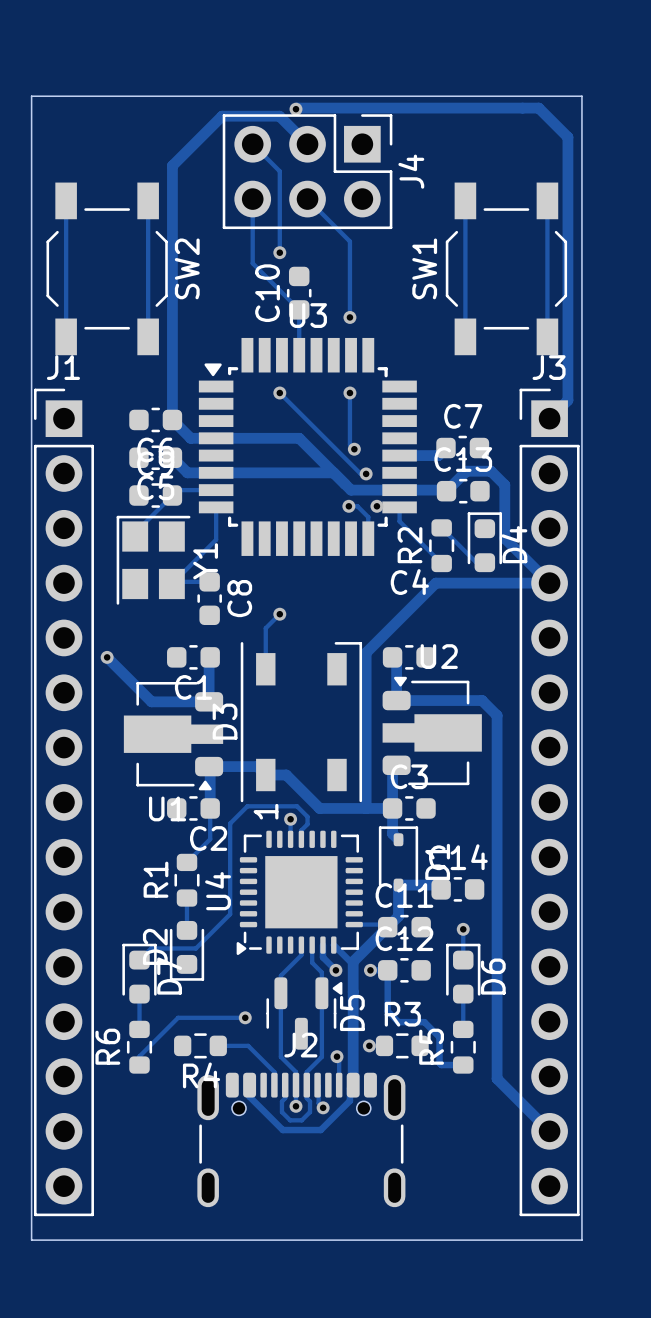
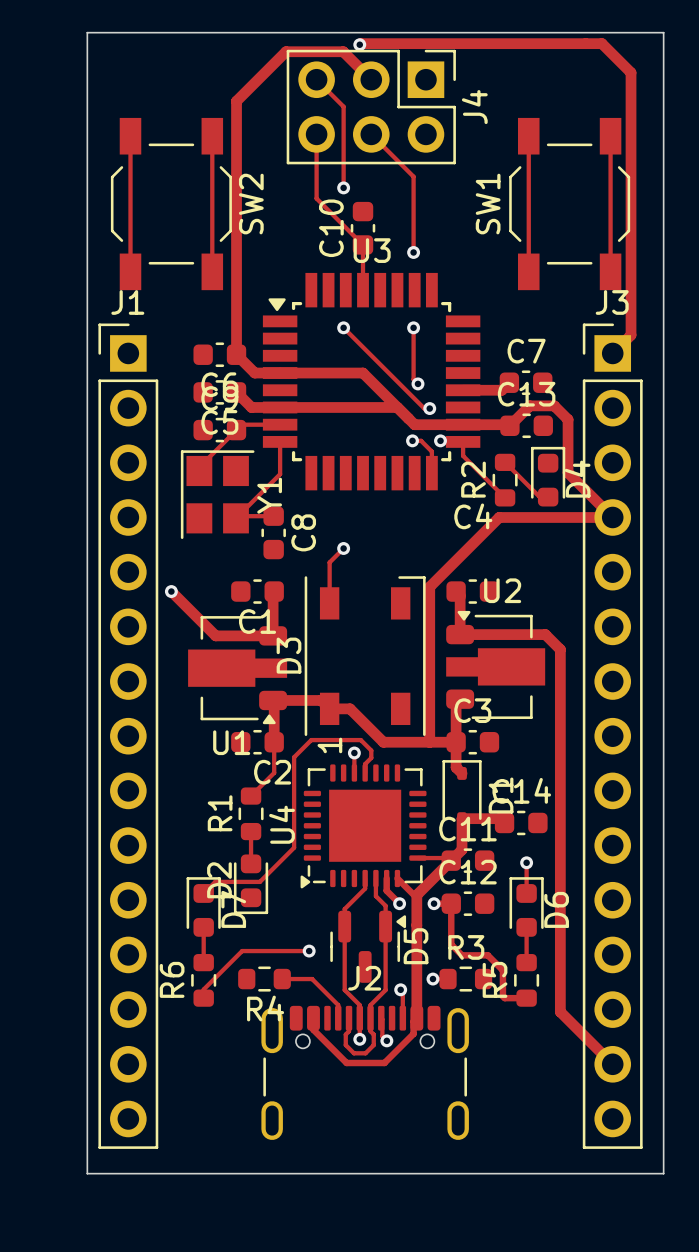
board edge: (31, 96) (581, 96) (581, 1240) (31, 1240) (31, 96) -> (87, 32) (87, 1173) (663, 1173) (663, 32) (87, 32)

